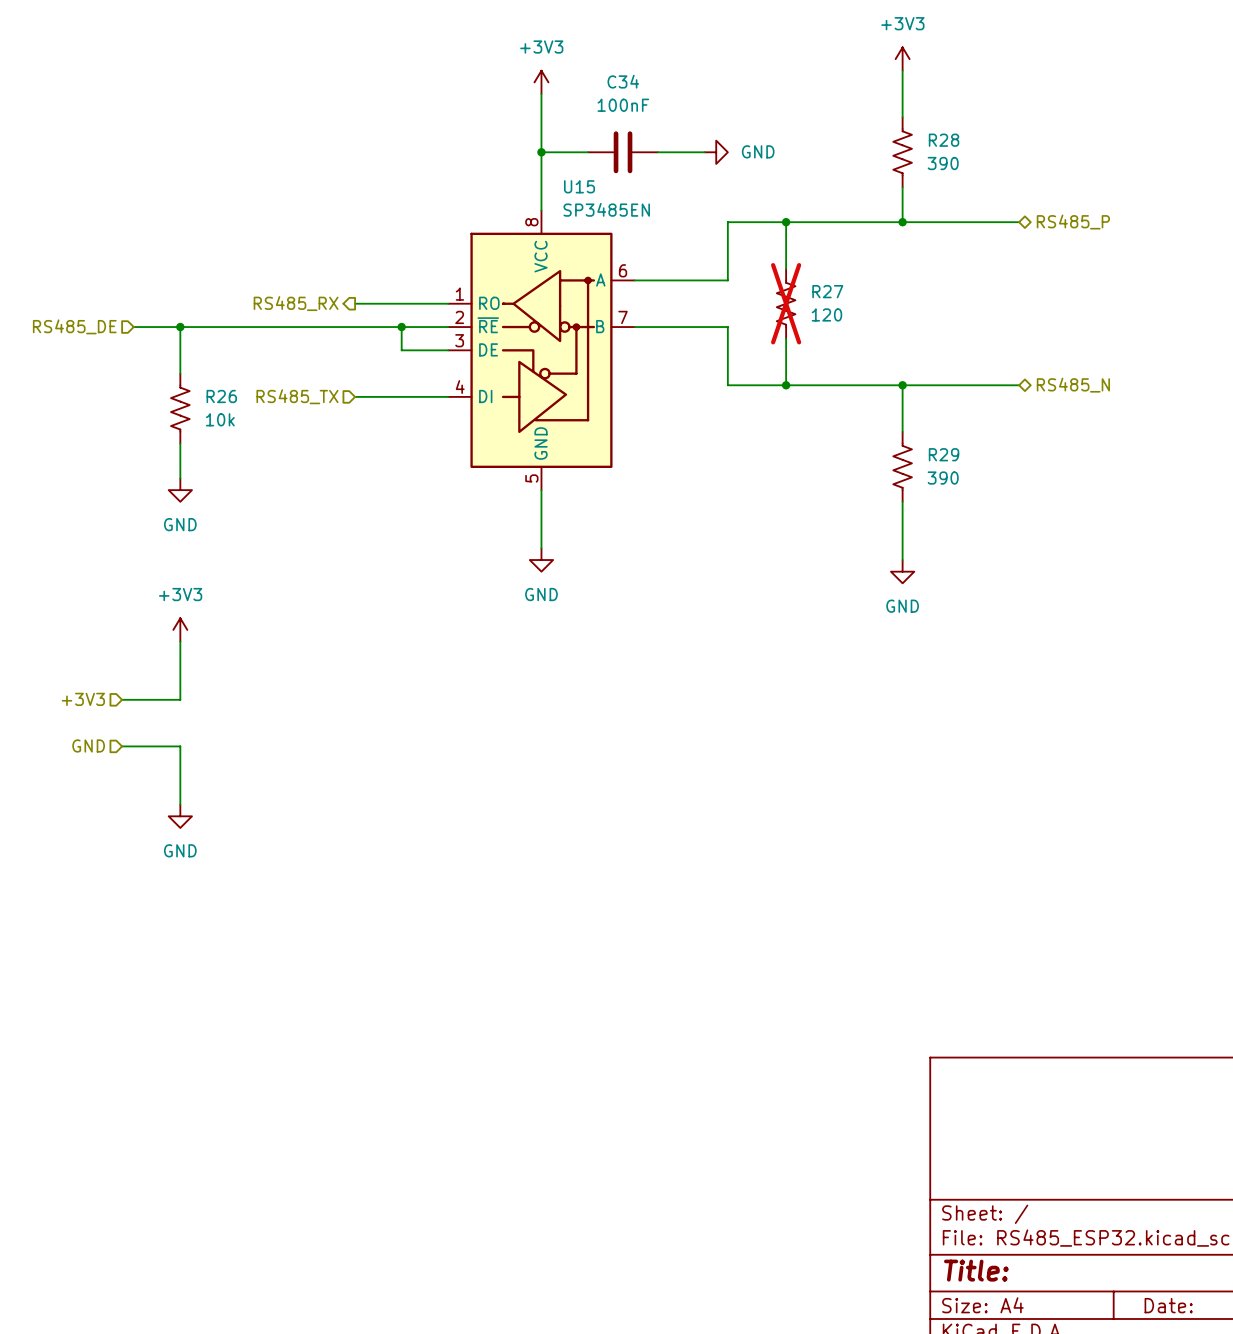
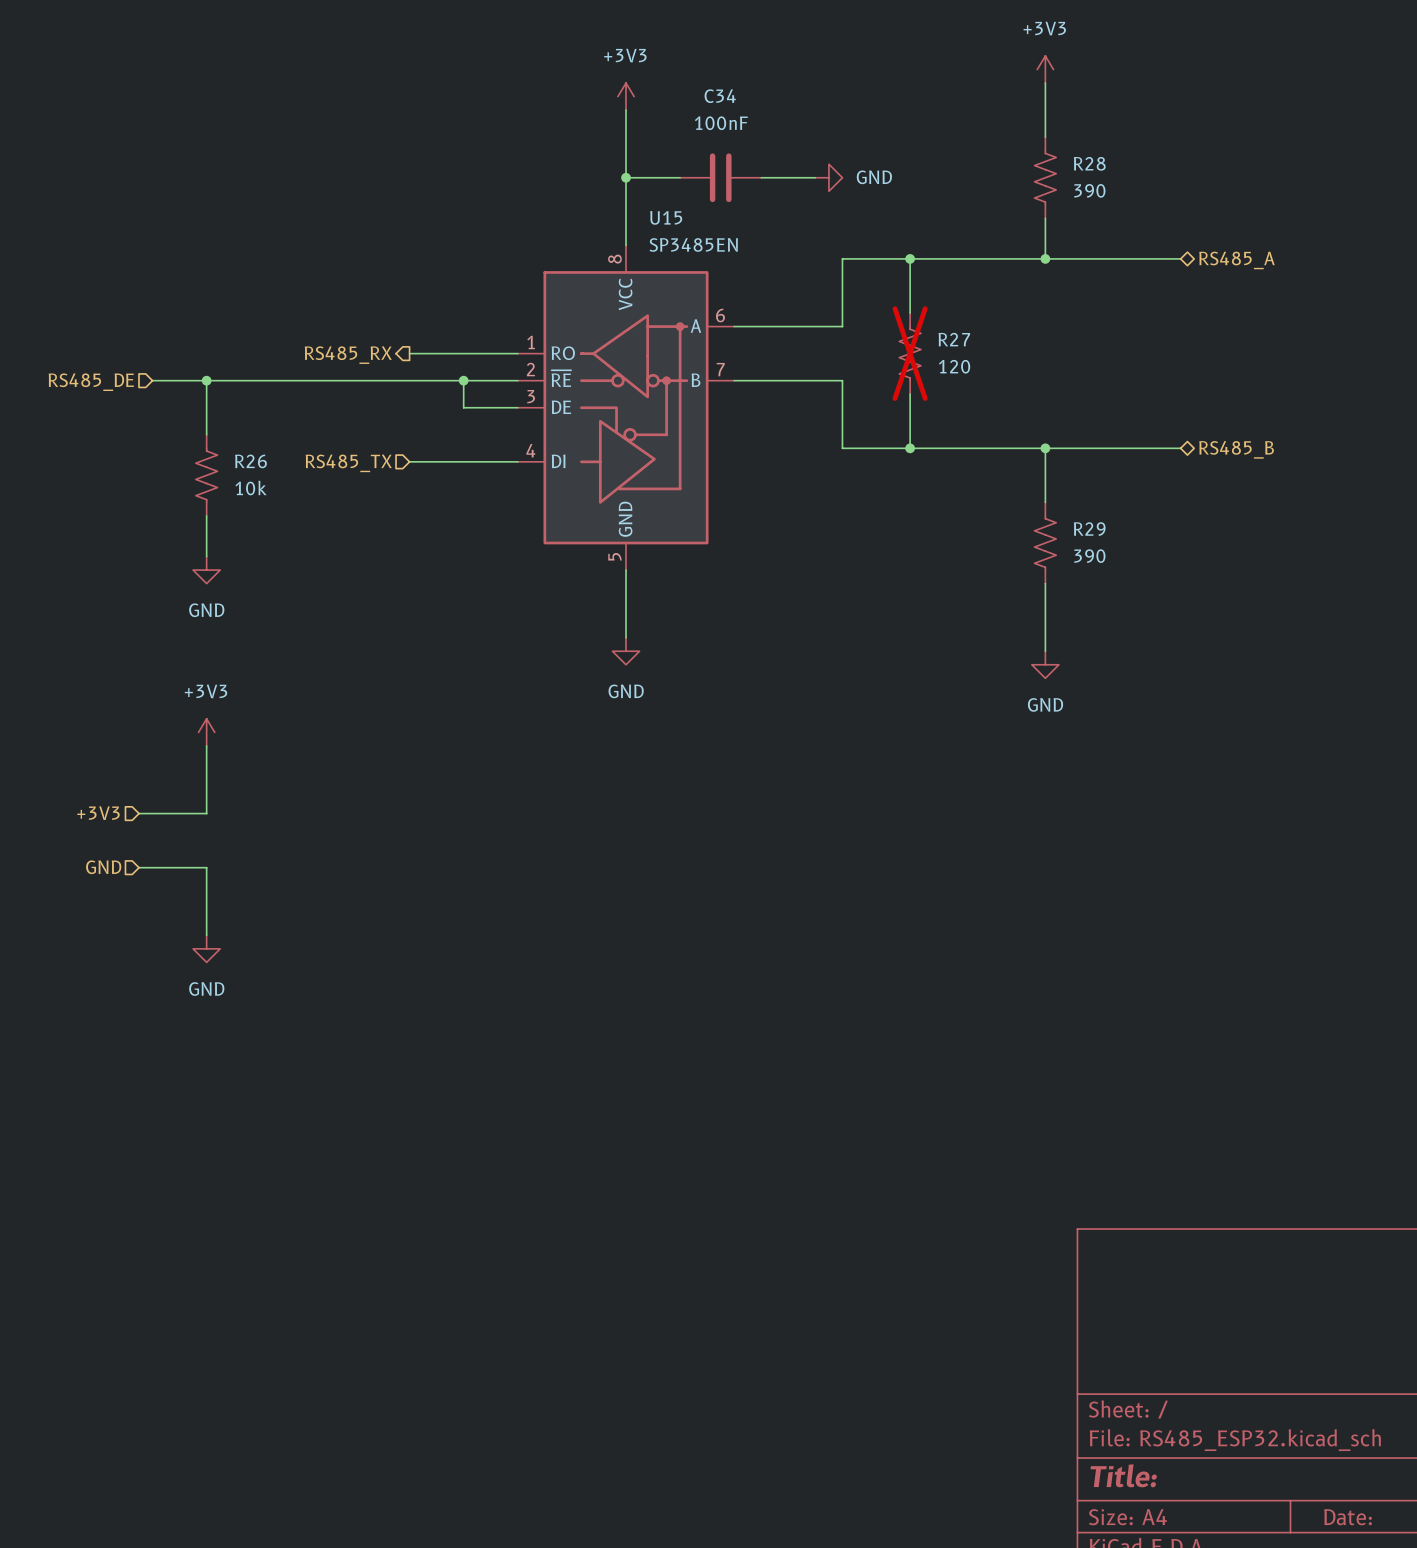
hierarchical label: RS485_P (1073, 222) -> RS485_A (1236, 260)
hierarchical label: RS485_N (1073, 385) -> RS485_B (1236, 449)

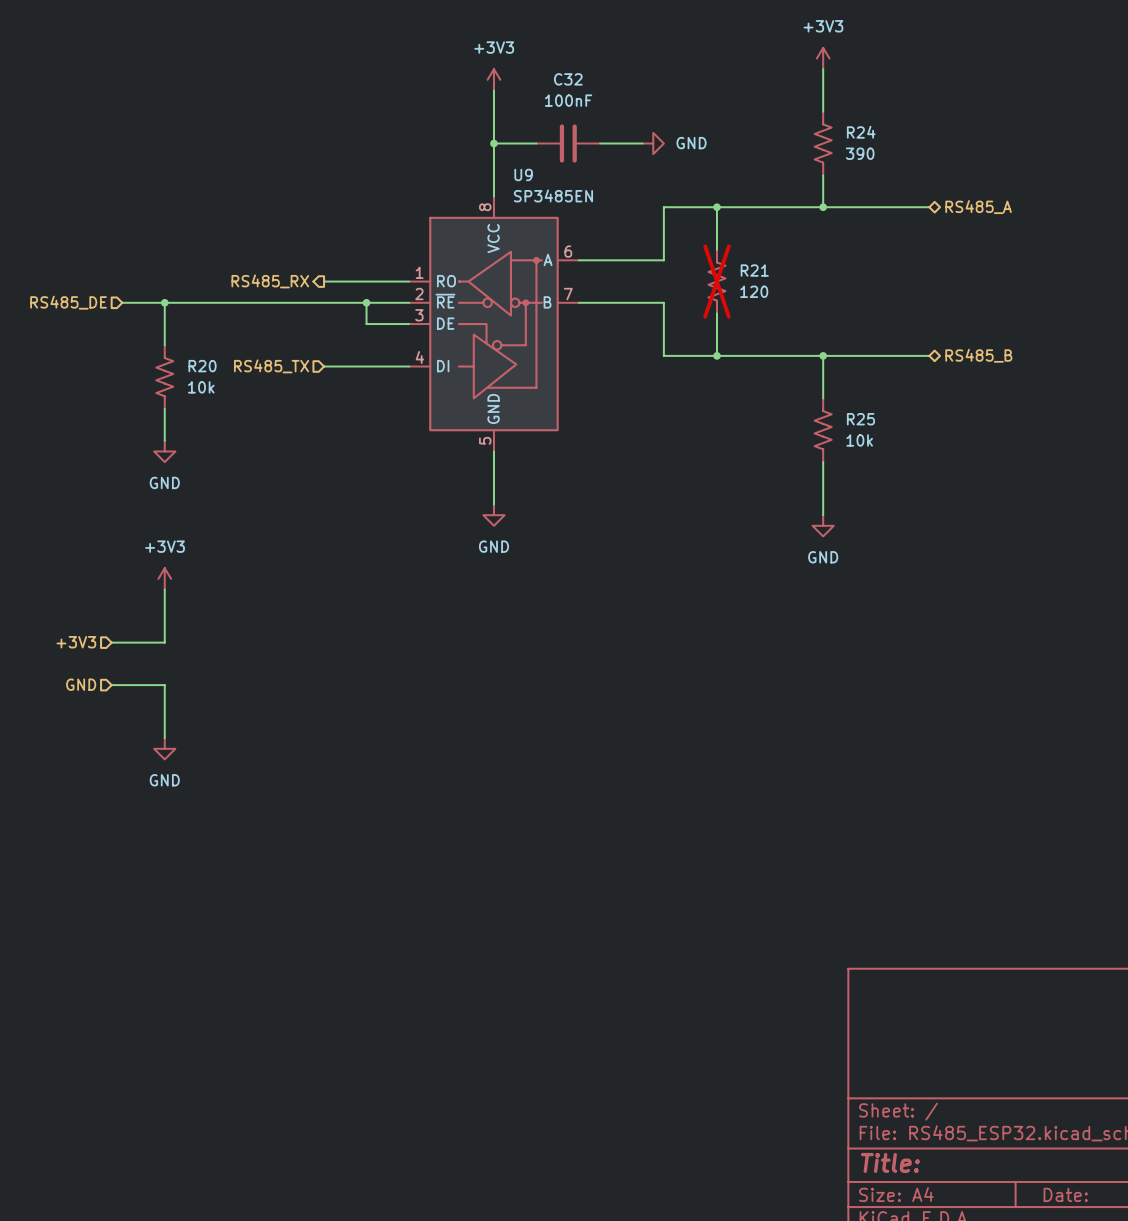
C34 name: C34 (720, 96) -> C32 (568, 79)
R28 name: R28 (1089, 163) -> R24 (861, 132)
U15 name: U15 (666, 217) -> U9 (523, 174)
R27 name: R27 (954, 339) -> R21 (754, 270)
R26 name: R26 (250, 461) -> R20 (202, 366)
R29 name: R29 (1089, 529) -> R25 (860, 419)
R29 value: 390 (1089, 556) -> 10k (859, 440)

